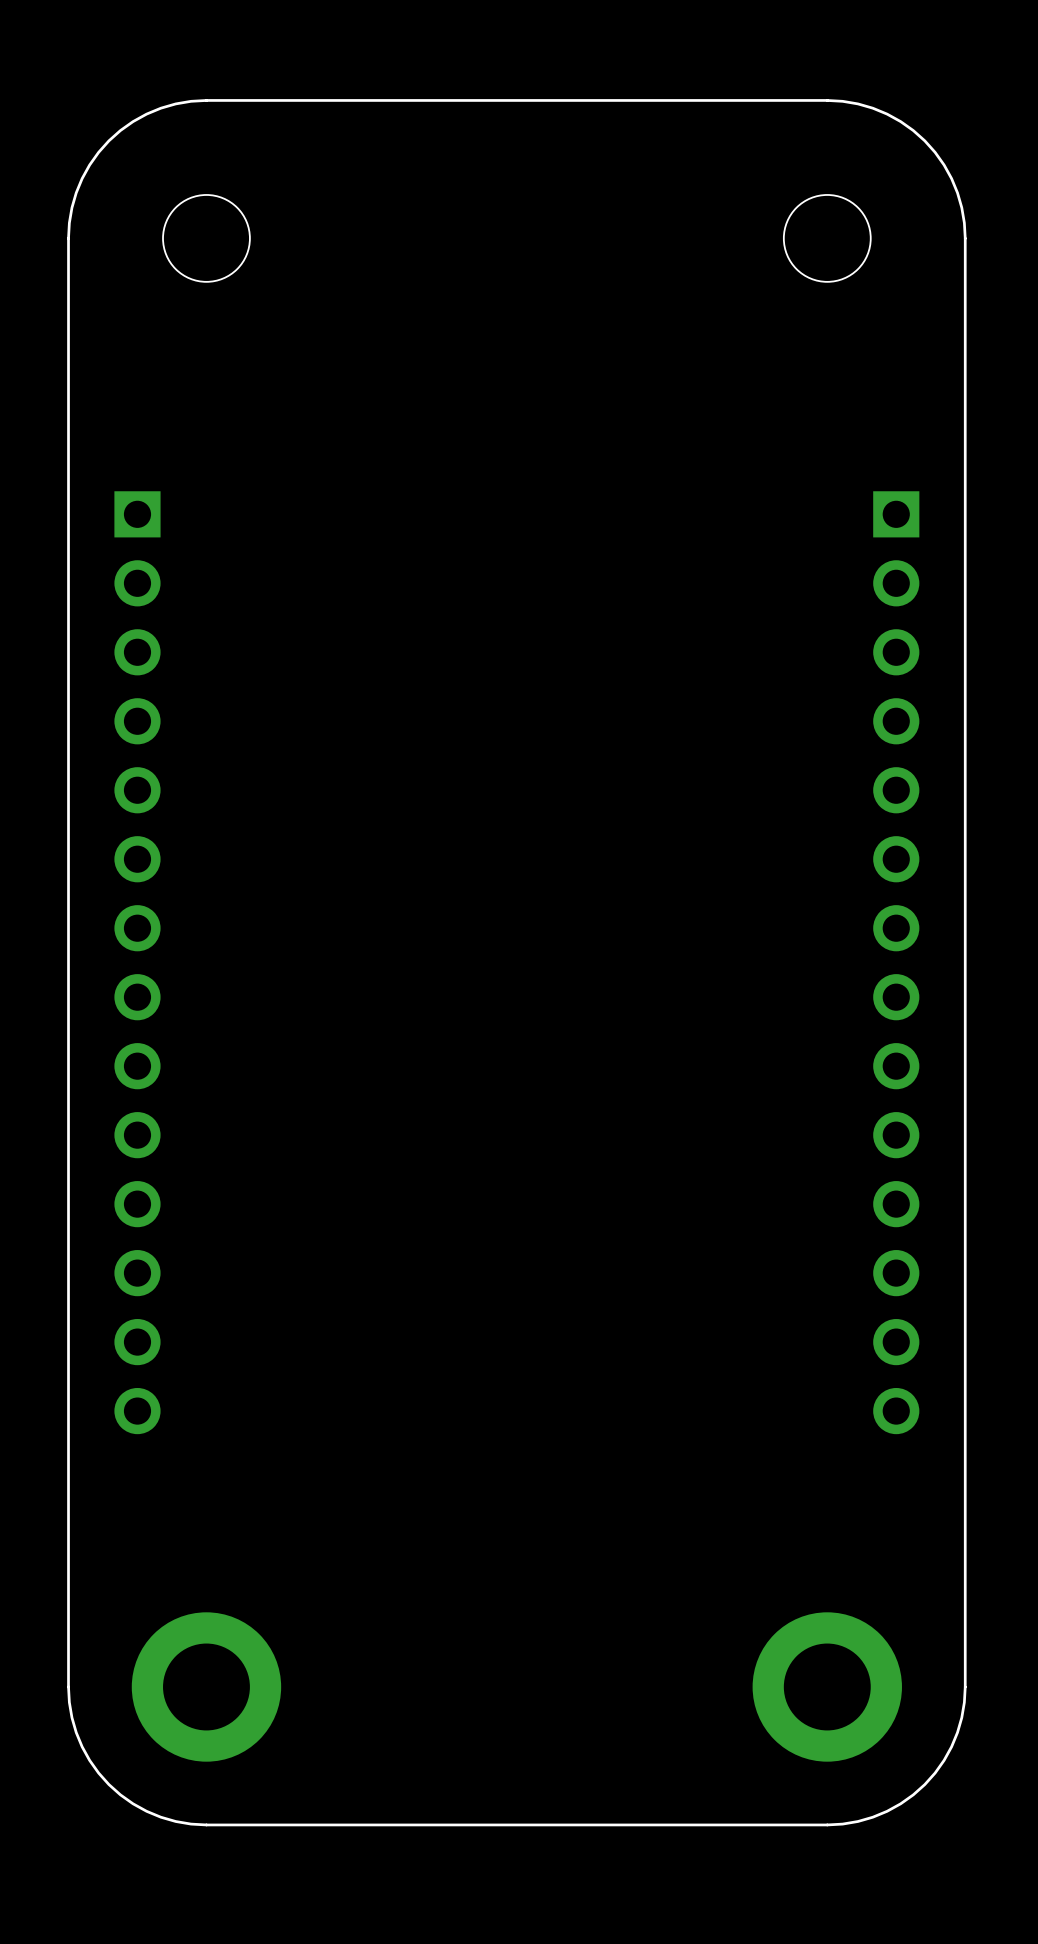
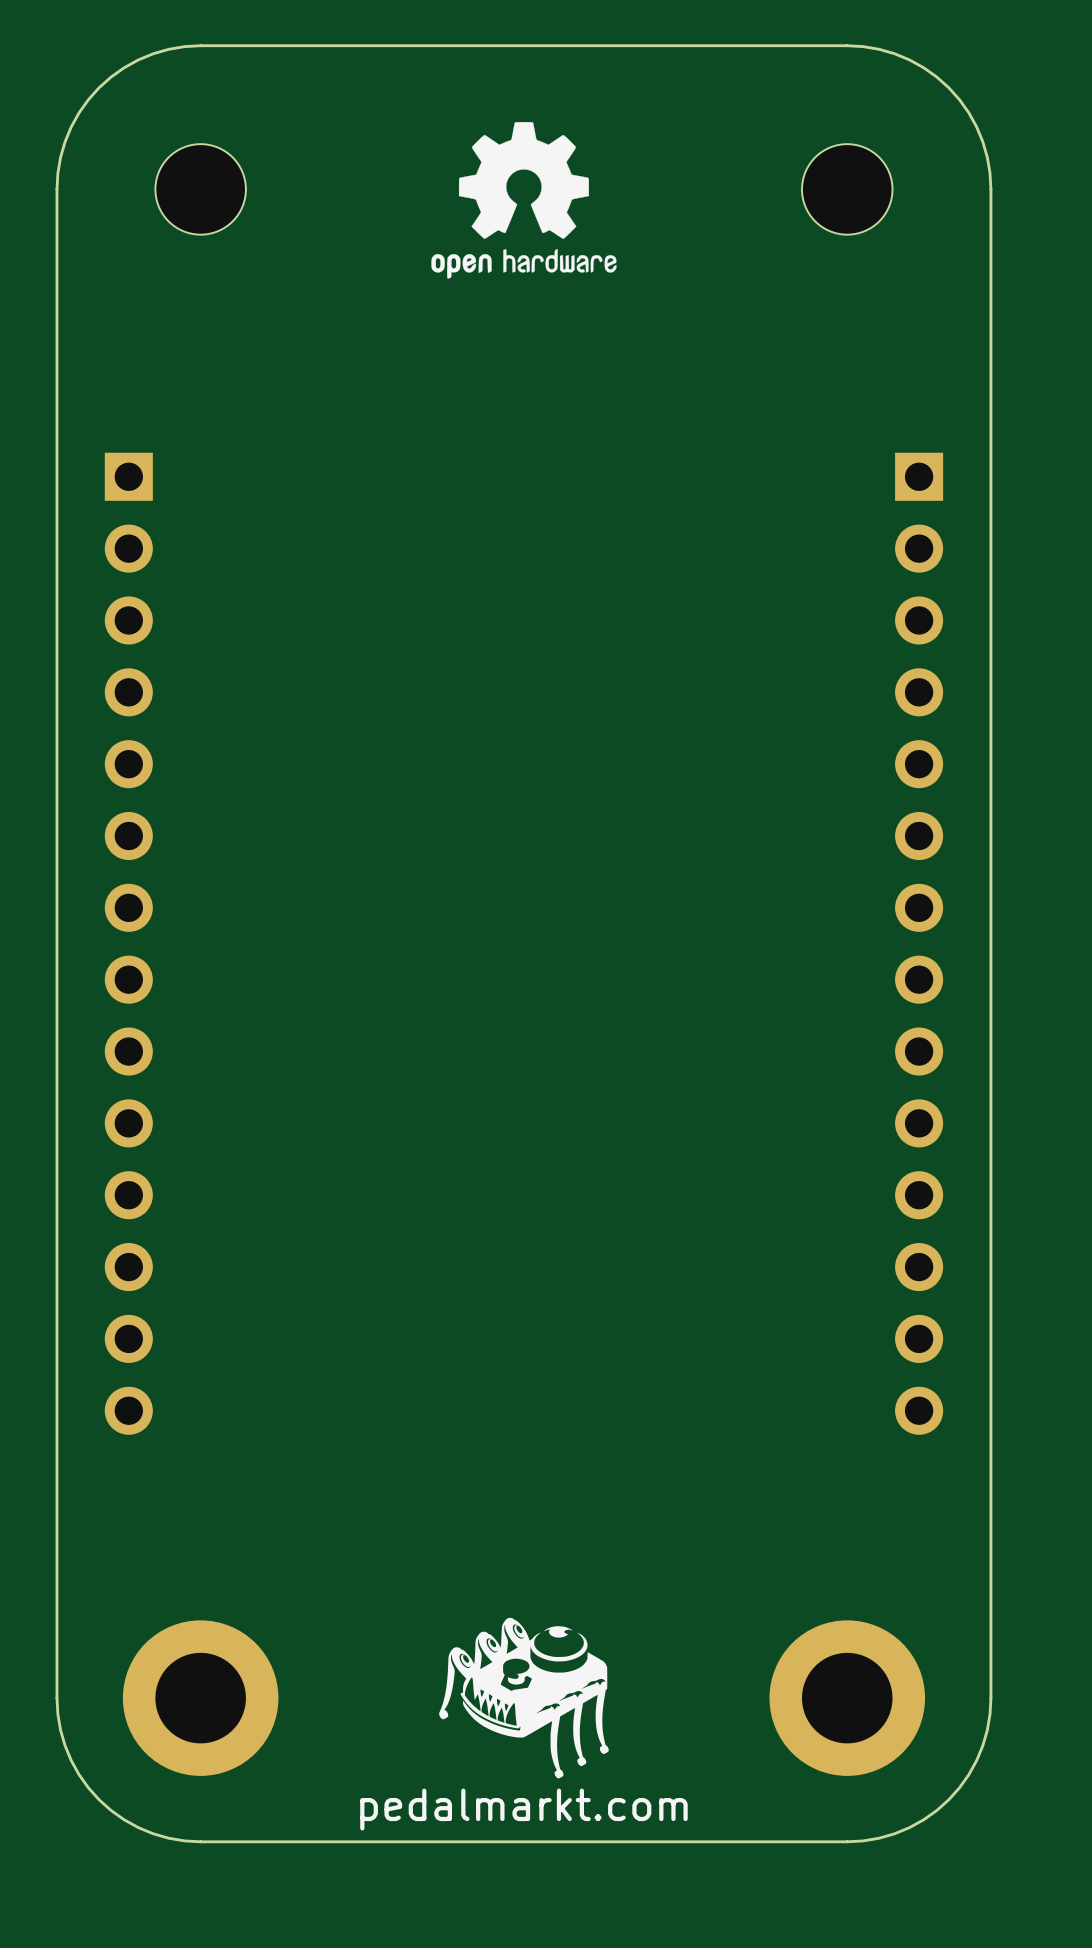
drawing: none -> [431, 122, 617, 279]
drawing: none -> [439, 1617, 609, 1779]
text: none -> pedalmarkt.com (523, 1809)

